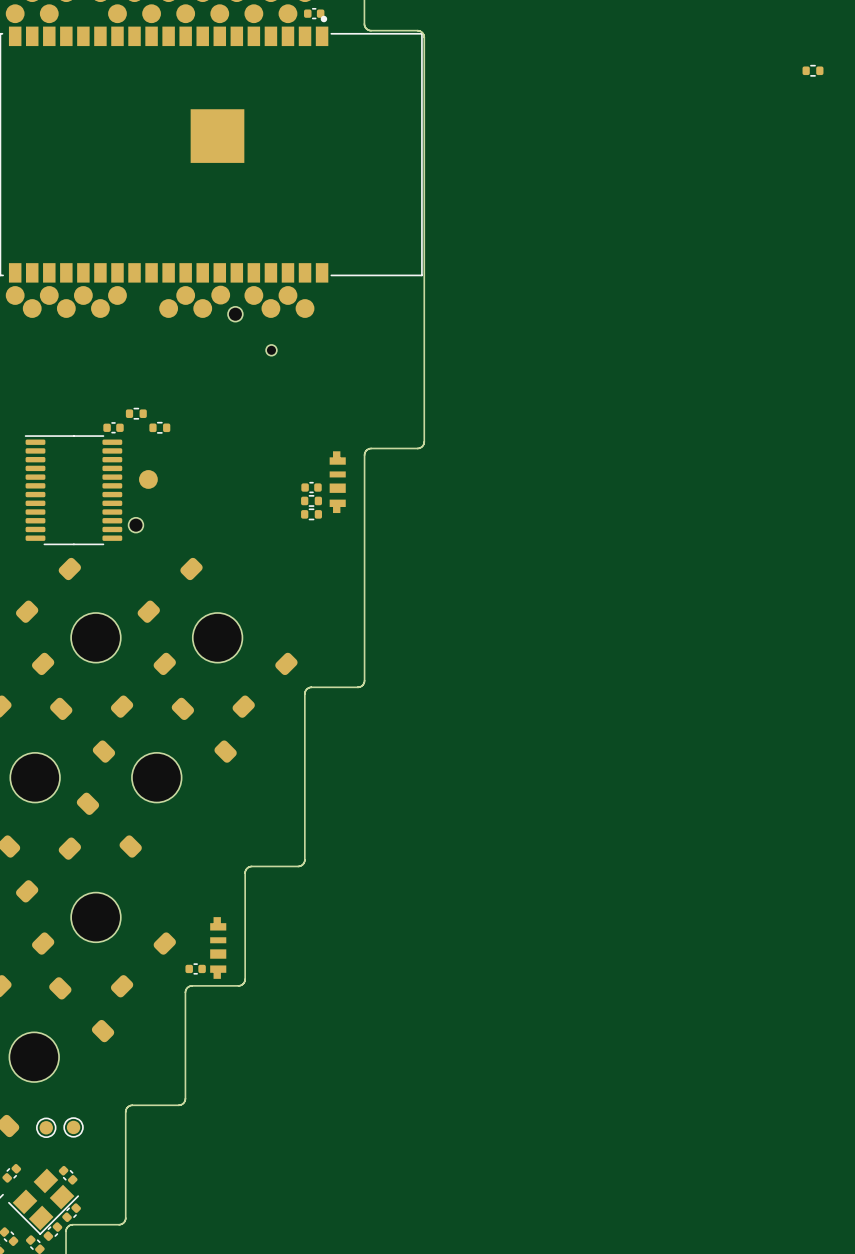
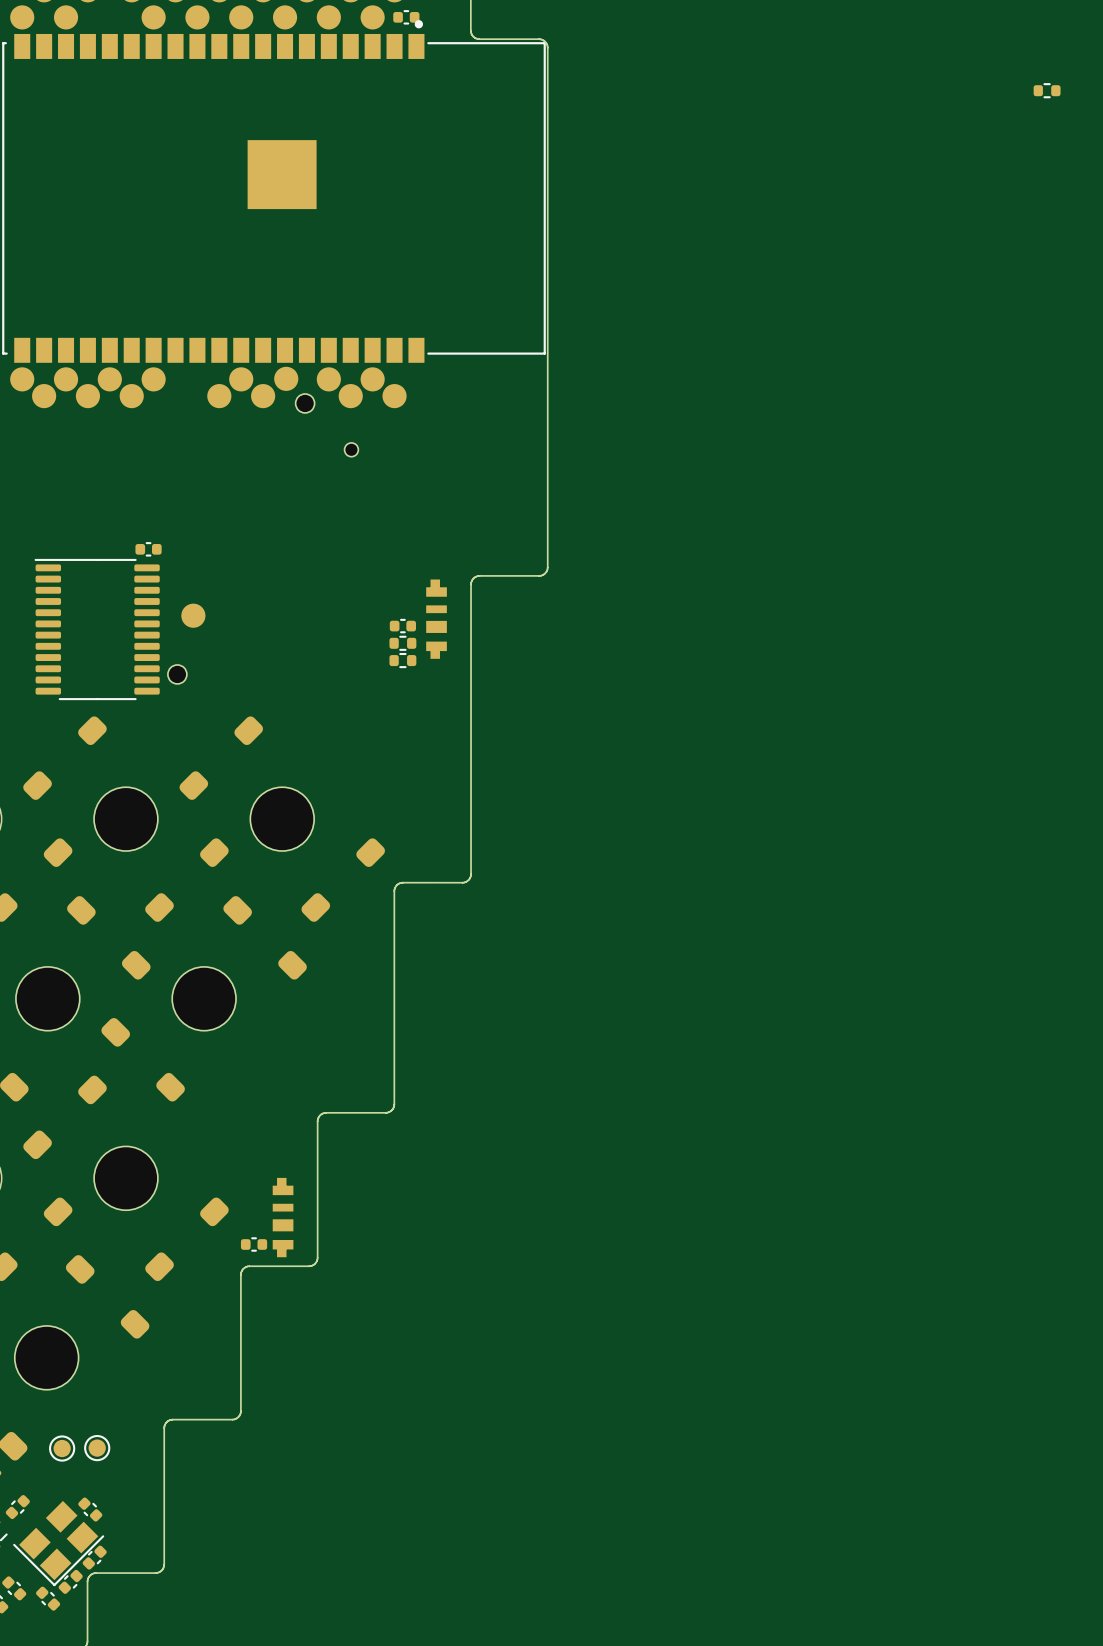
part: (136, 413) -> none
part: (159, 427) -> none

